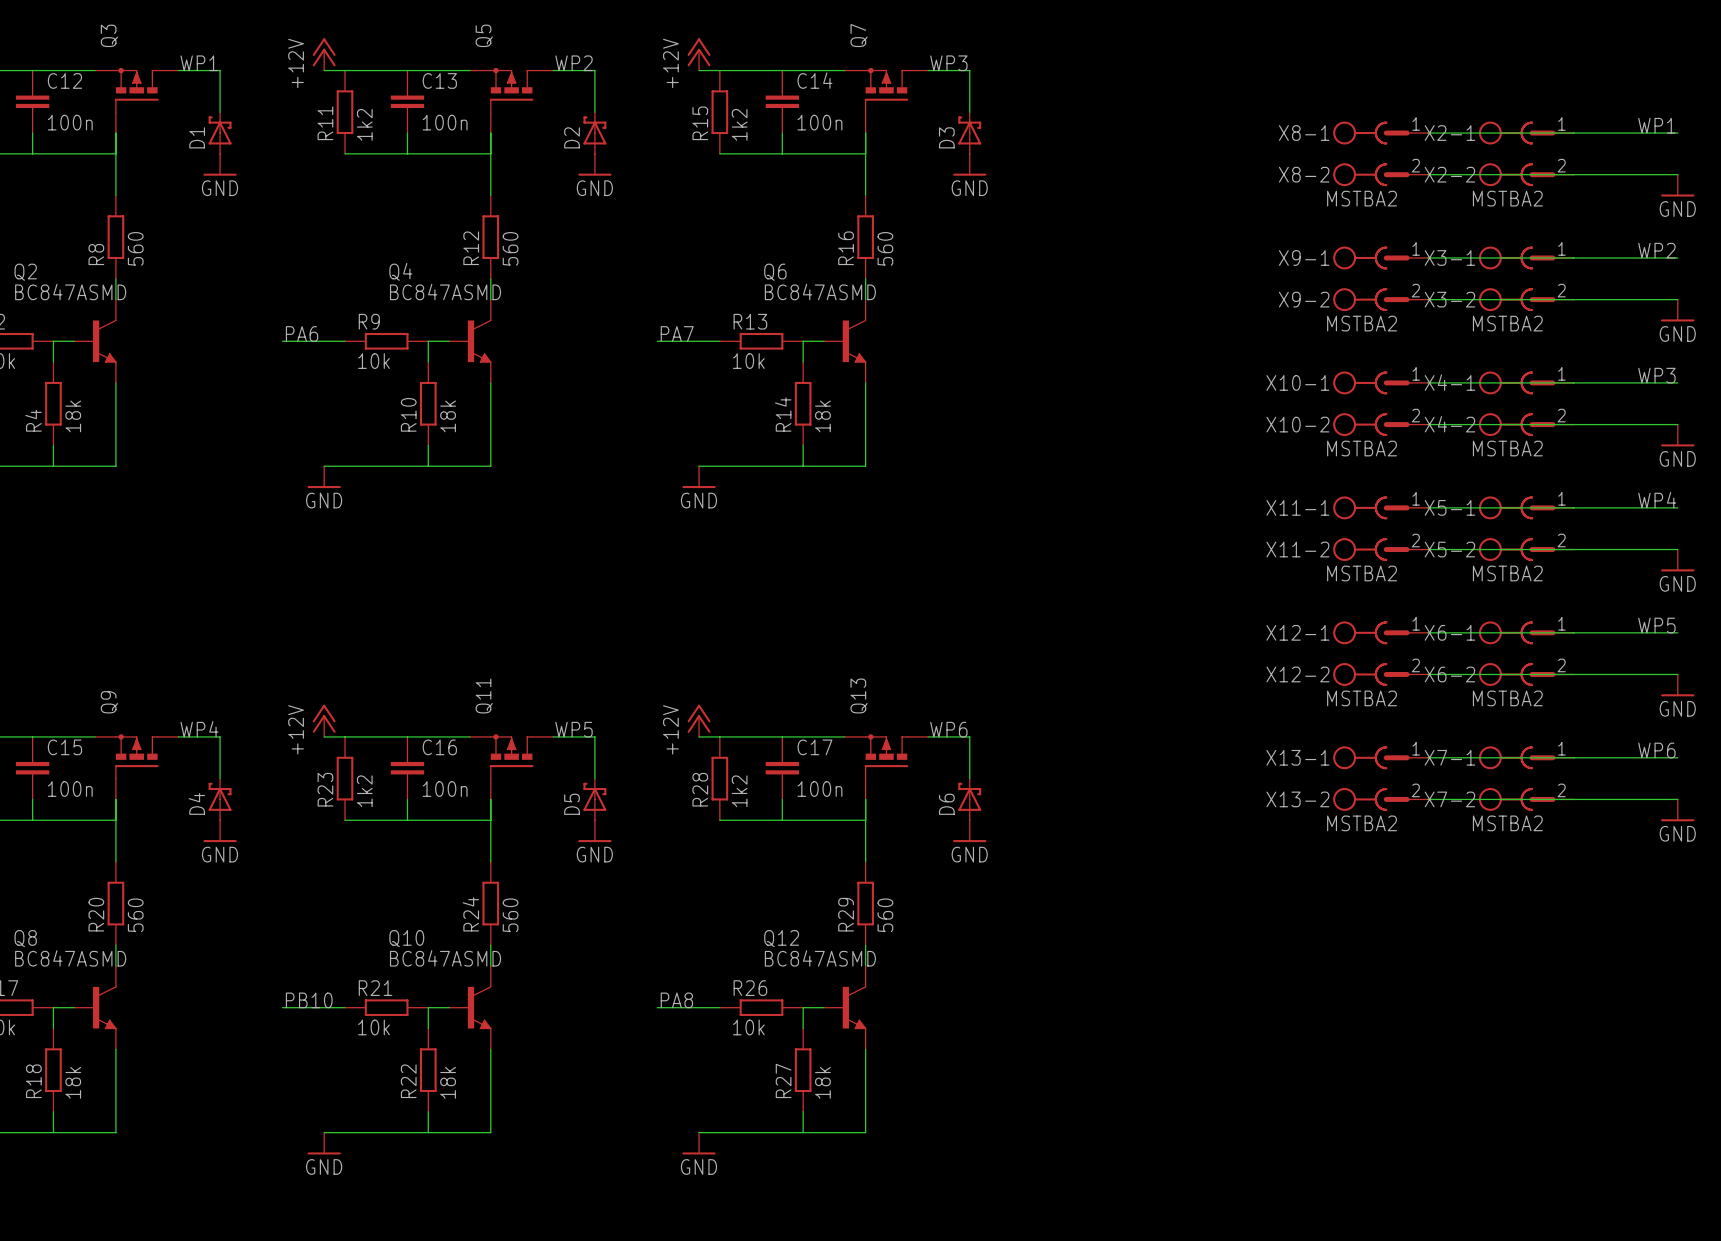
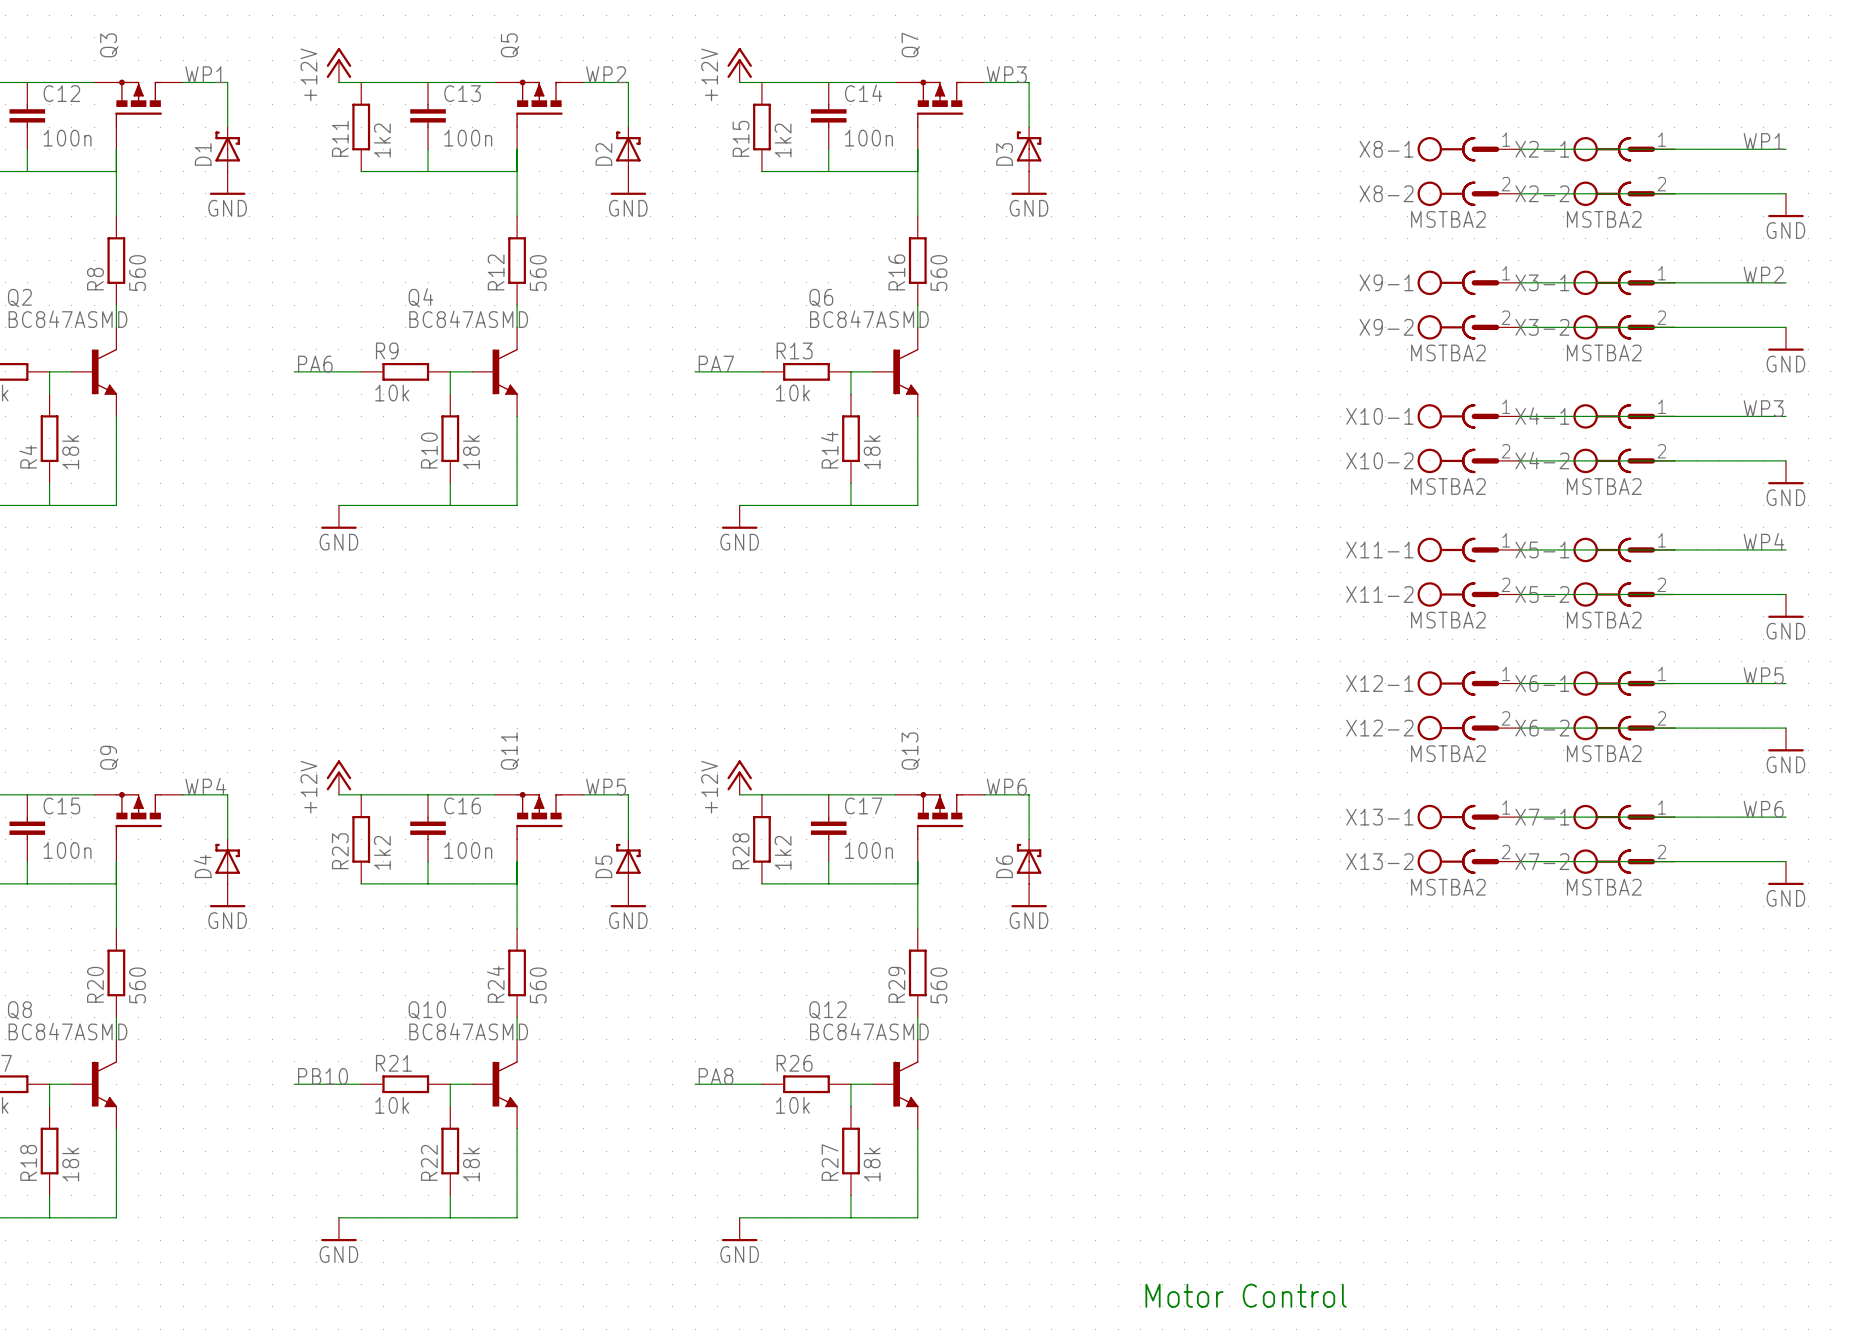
text: none -> Motor Control (1246, 1295)

